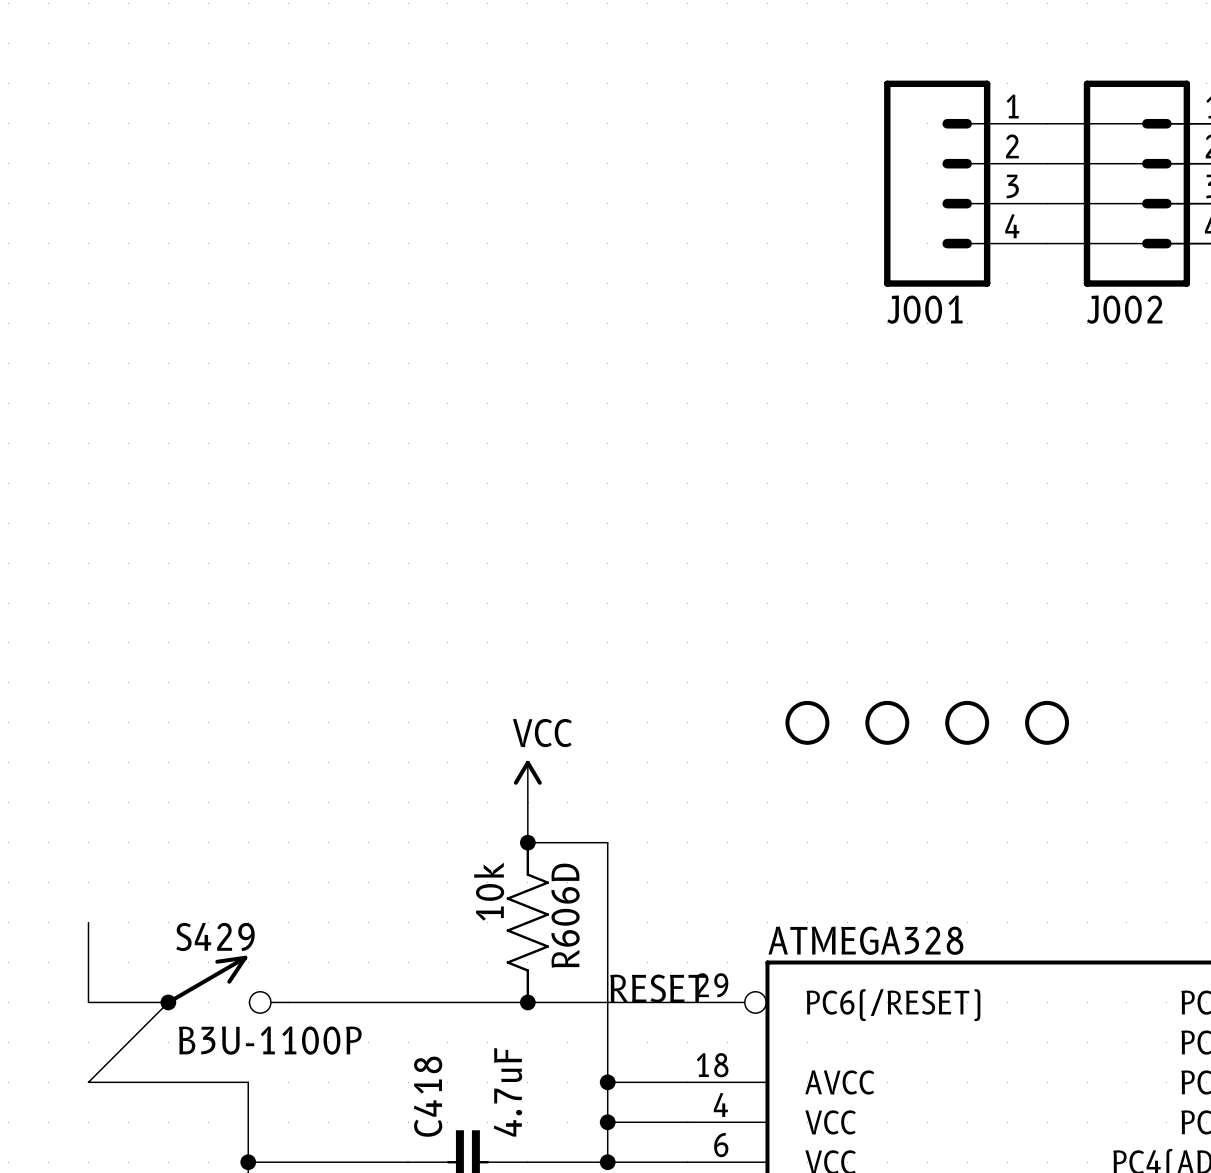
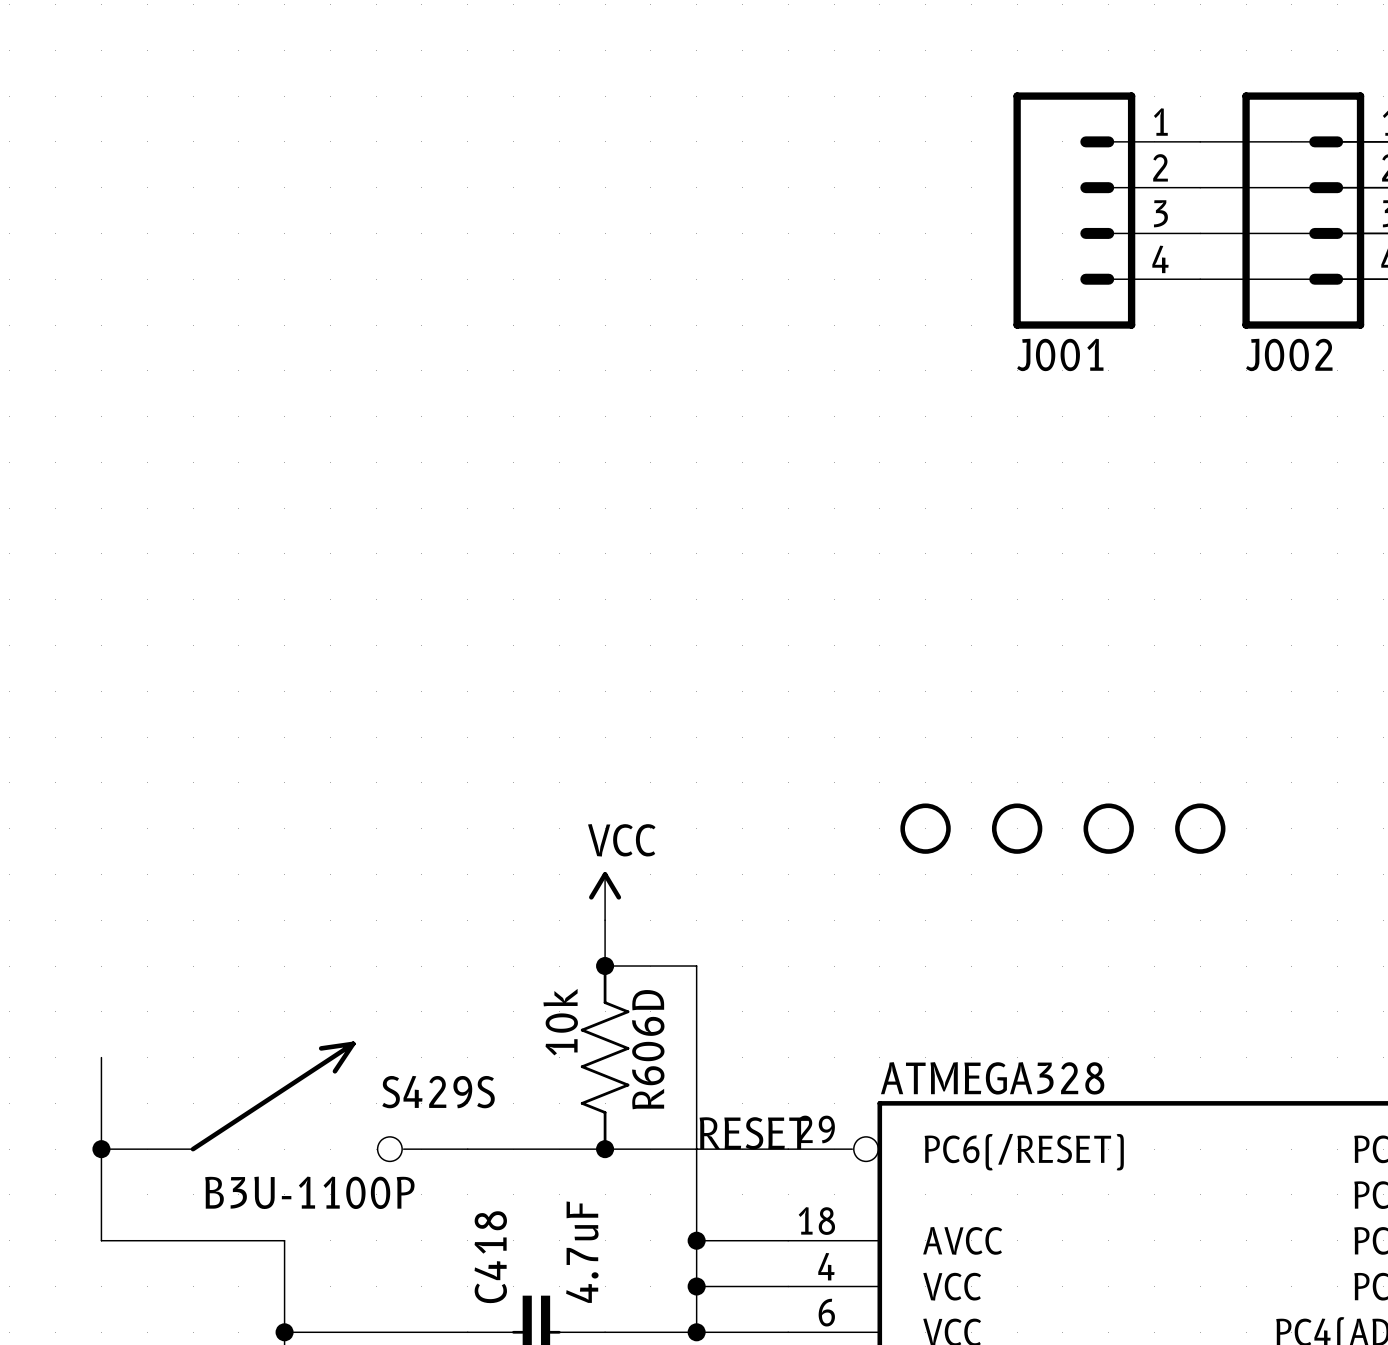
S429S: none -> B3U-1100P (284, 1101)
S429: B3U-1100P (227, 984) -> none
wire: (88, 1002) (168, 1002) (88, 1082) -> (101, 1149) (101, 1240)
junction position: (168, 1002) -> (101, 1149)
wire: (288, 1002) (408, 1002) -> none

